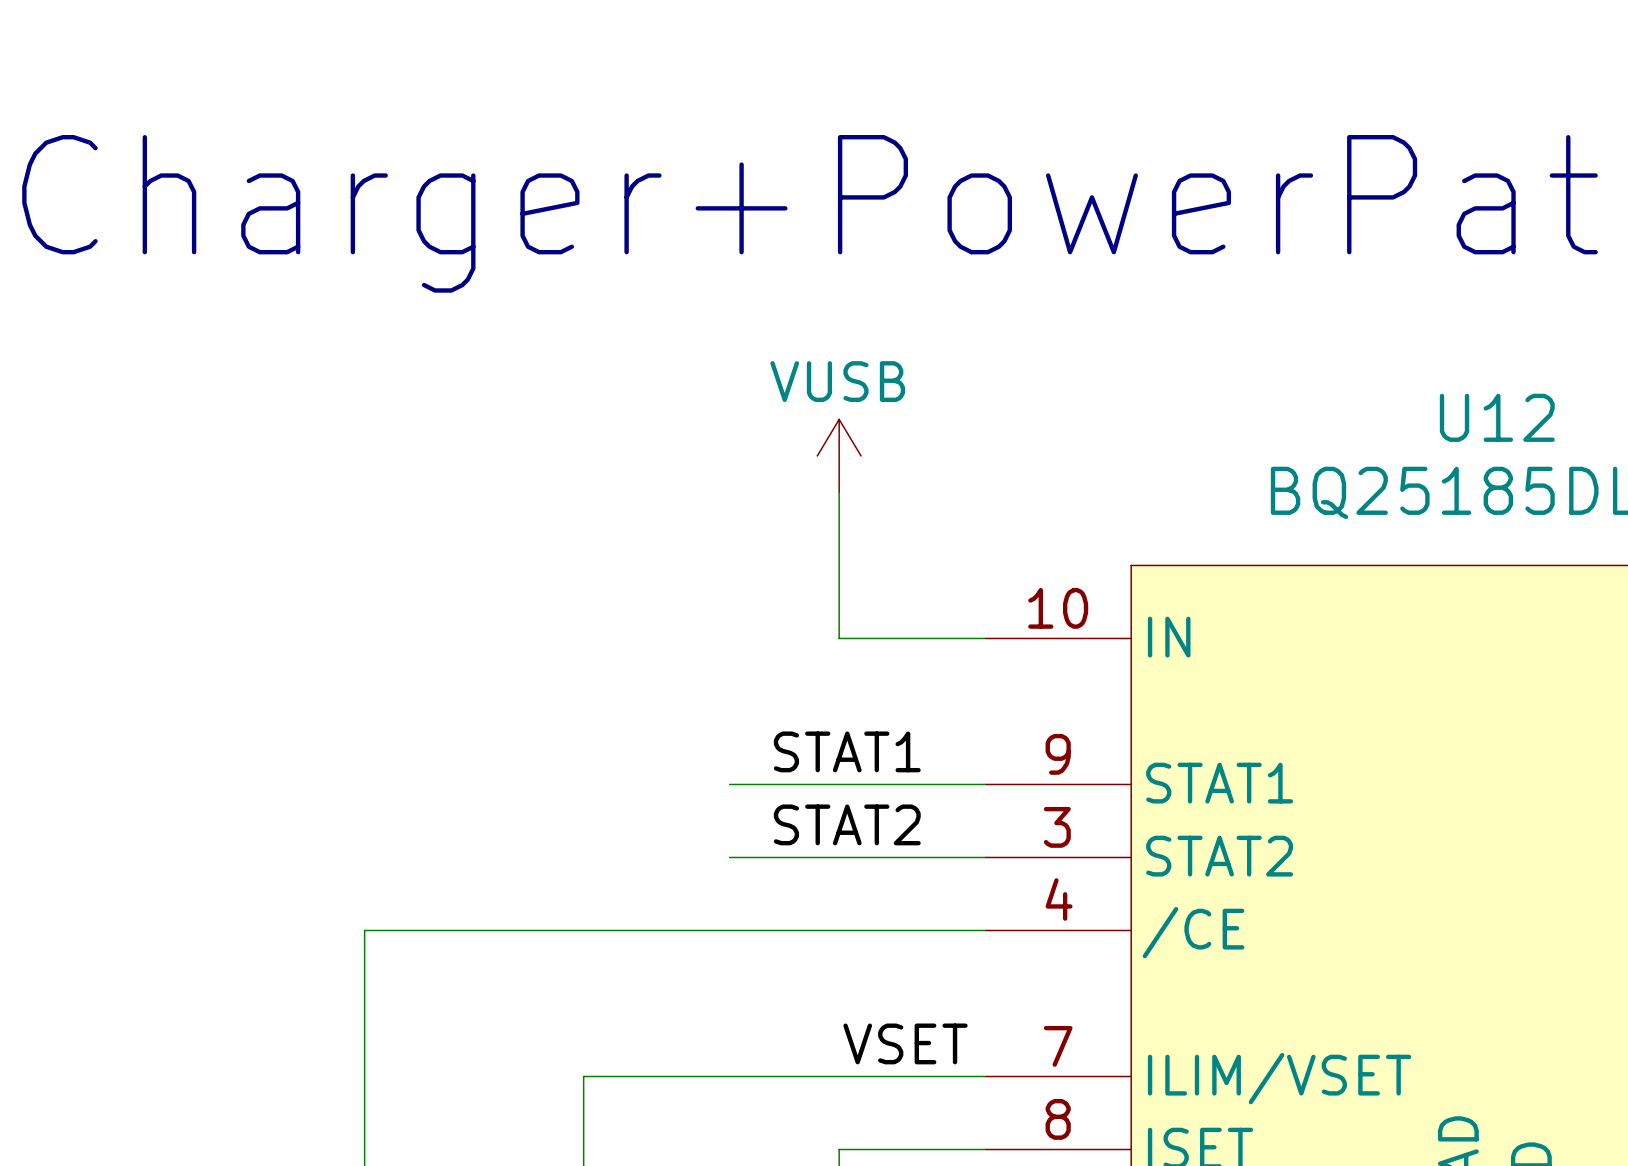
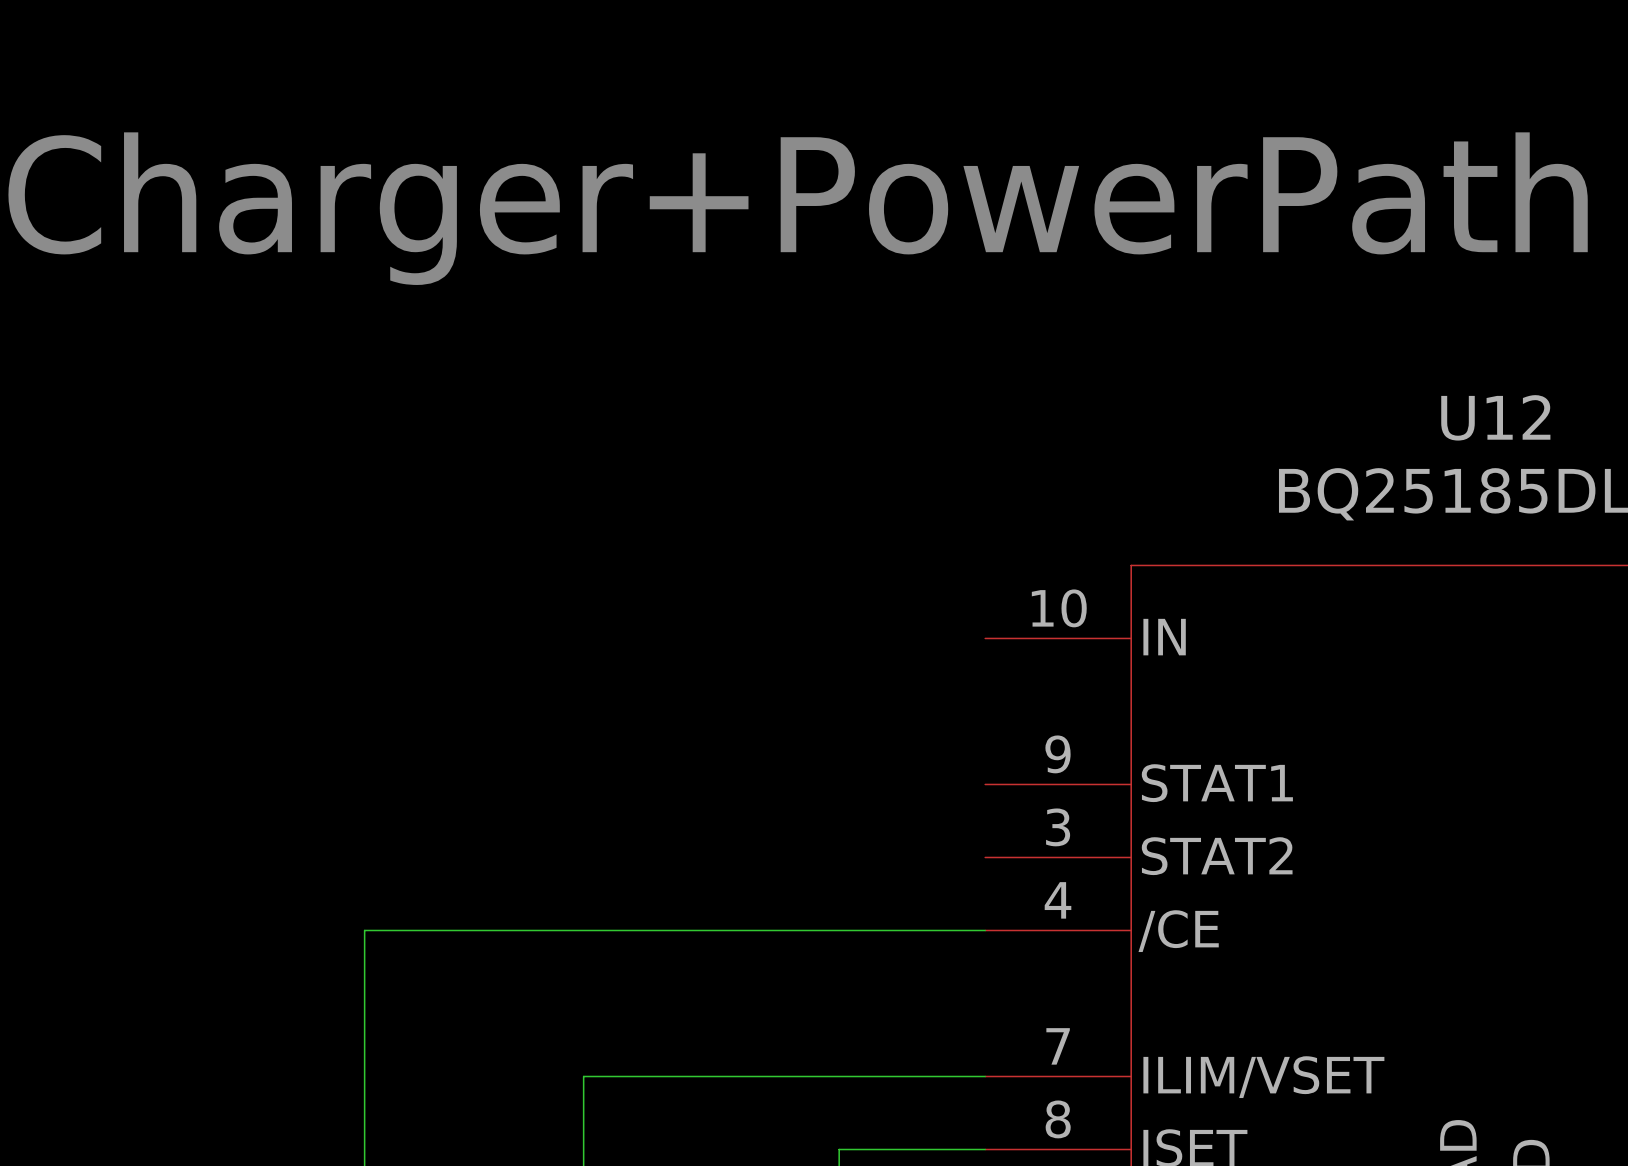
power symbol: VUSB (839, 455) -> none
wire: (839, 492) (839, 638) (985, 638) -> none
label: STAT1 (847, 751) -> none
wire: (729, 784) (985, 784) -> none
label: STAT2 (847, 824) -> none
wire: (729, 857) (985, 857) -> none
label: VSET (905, 1043) -> none

